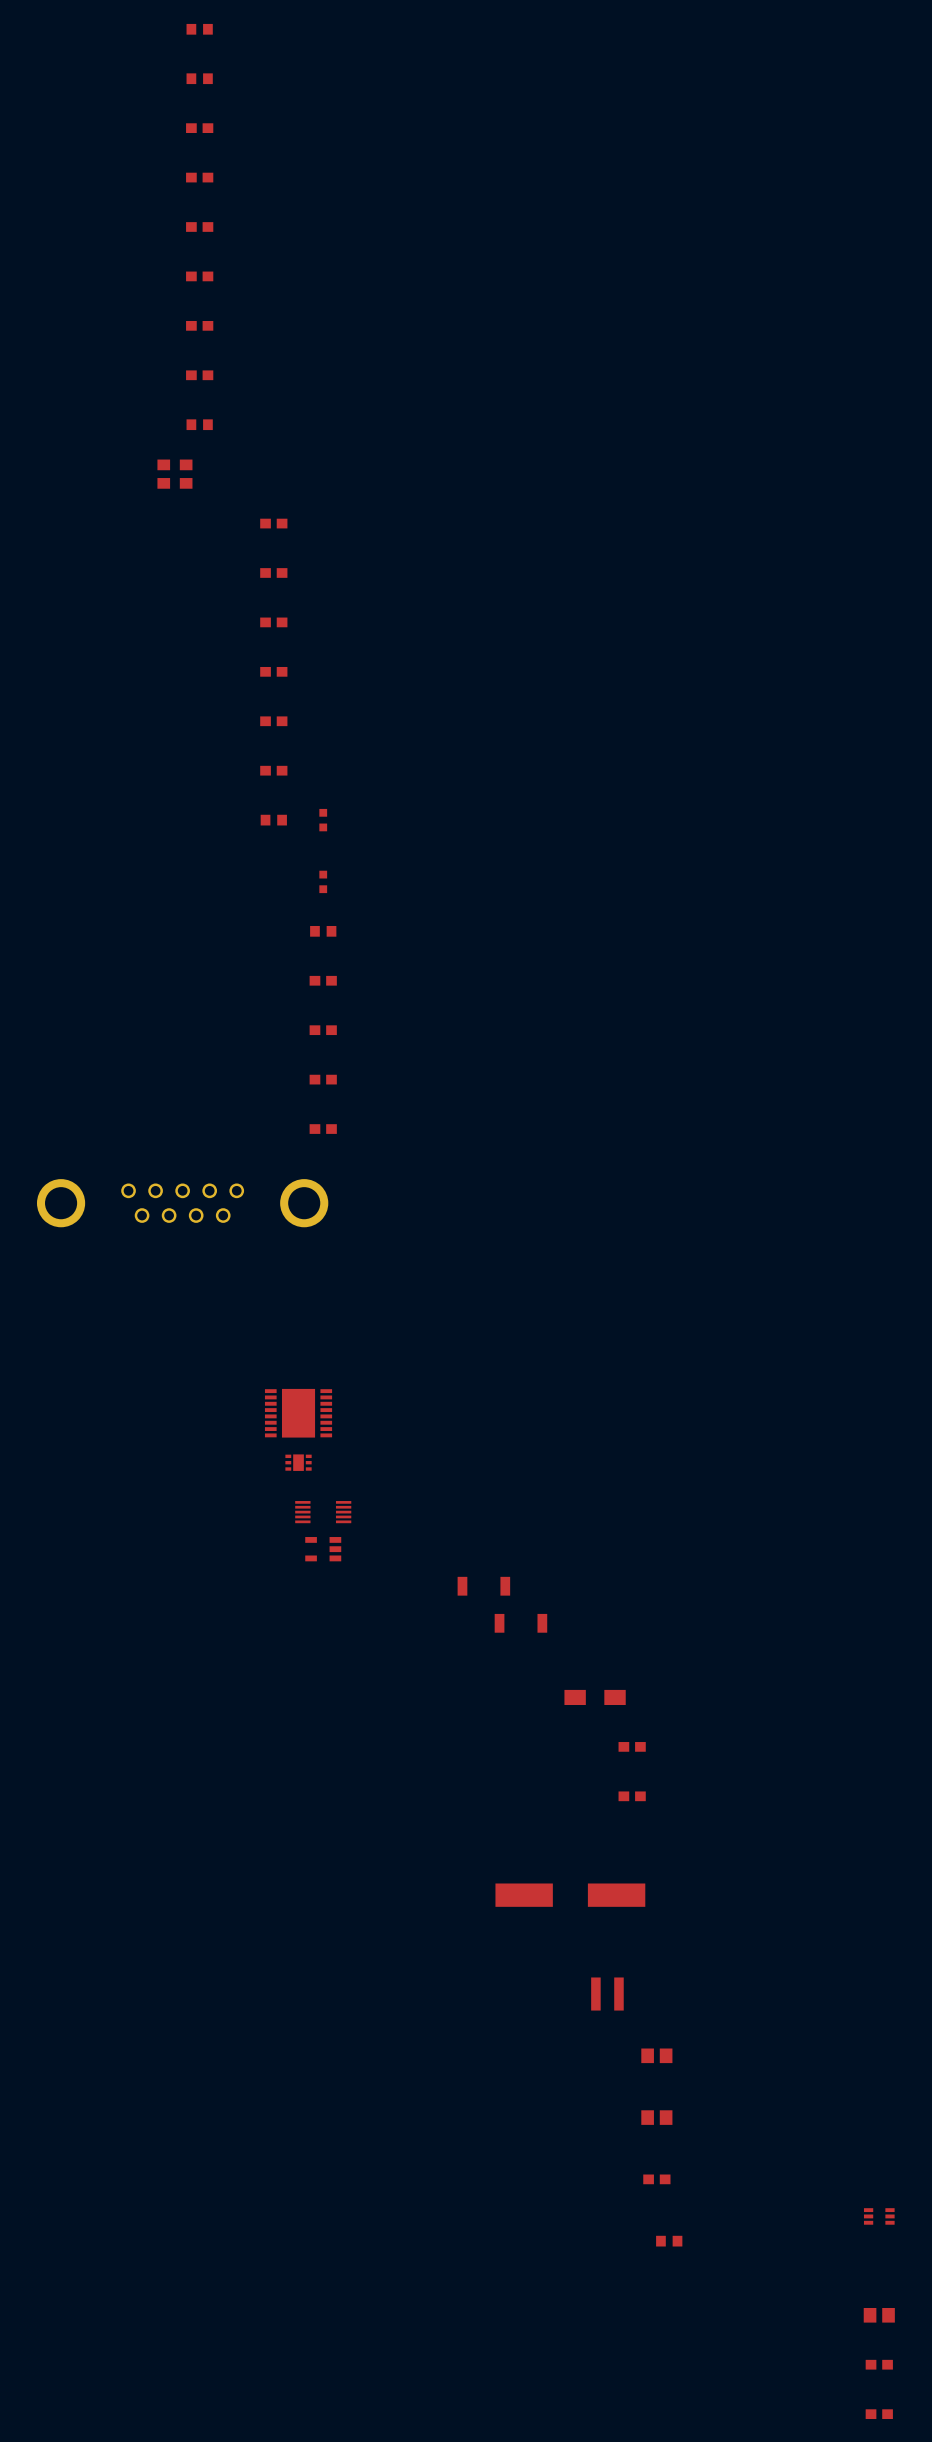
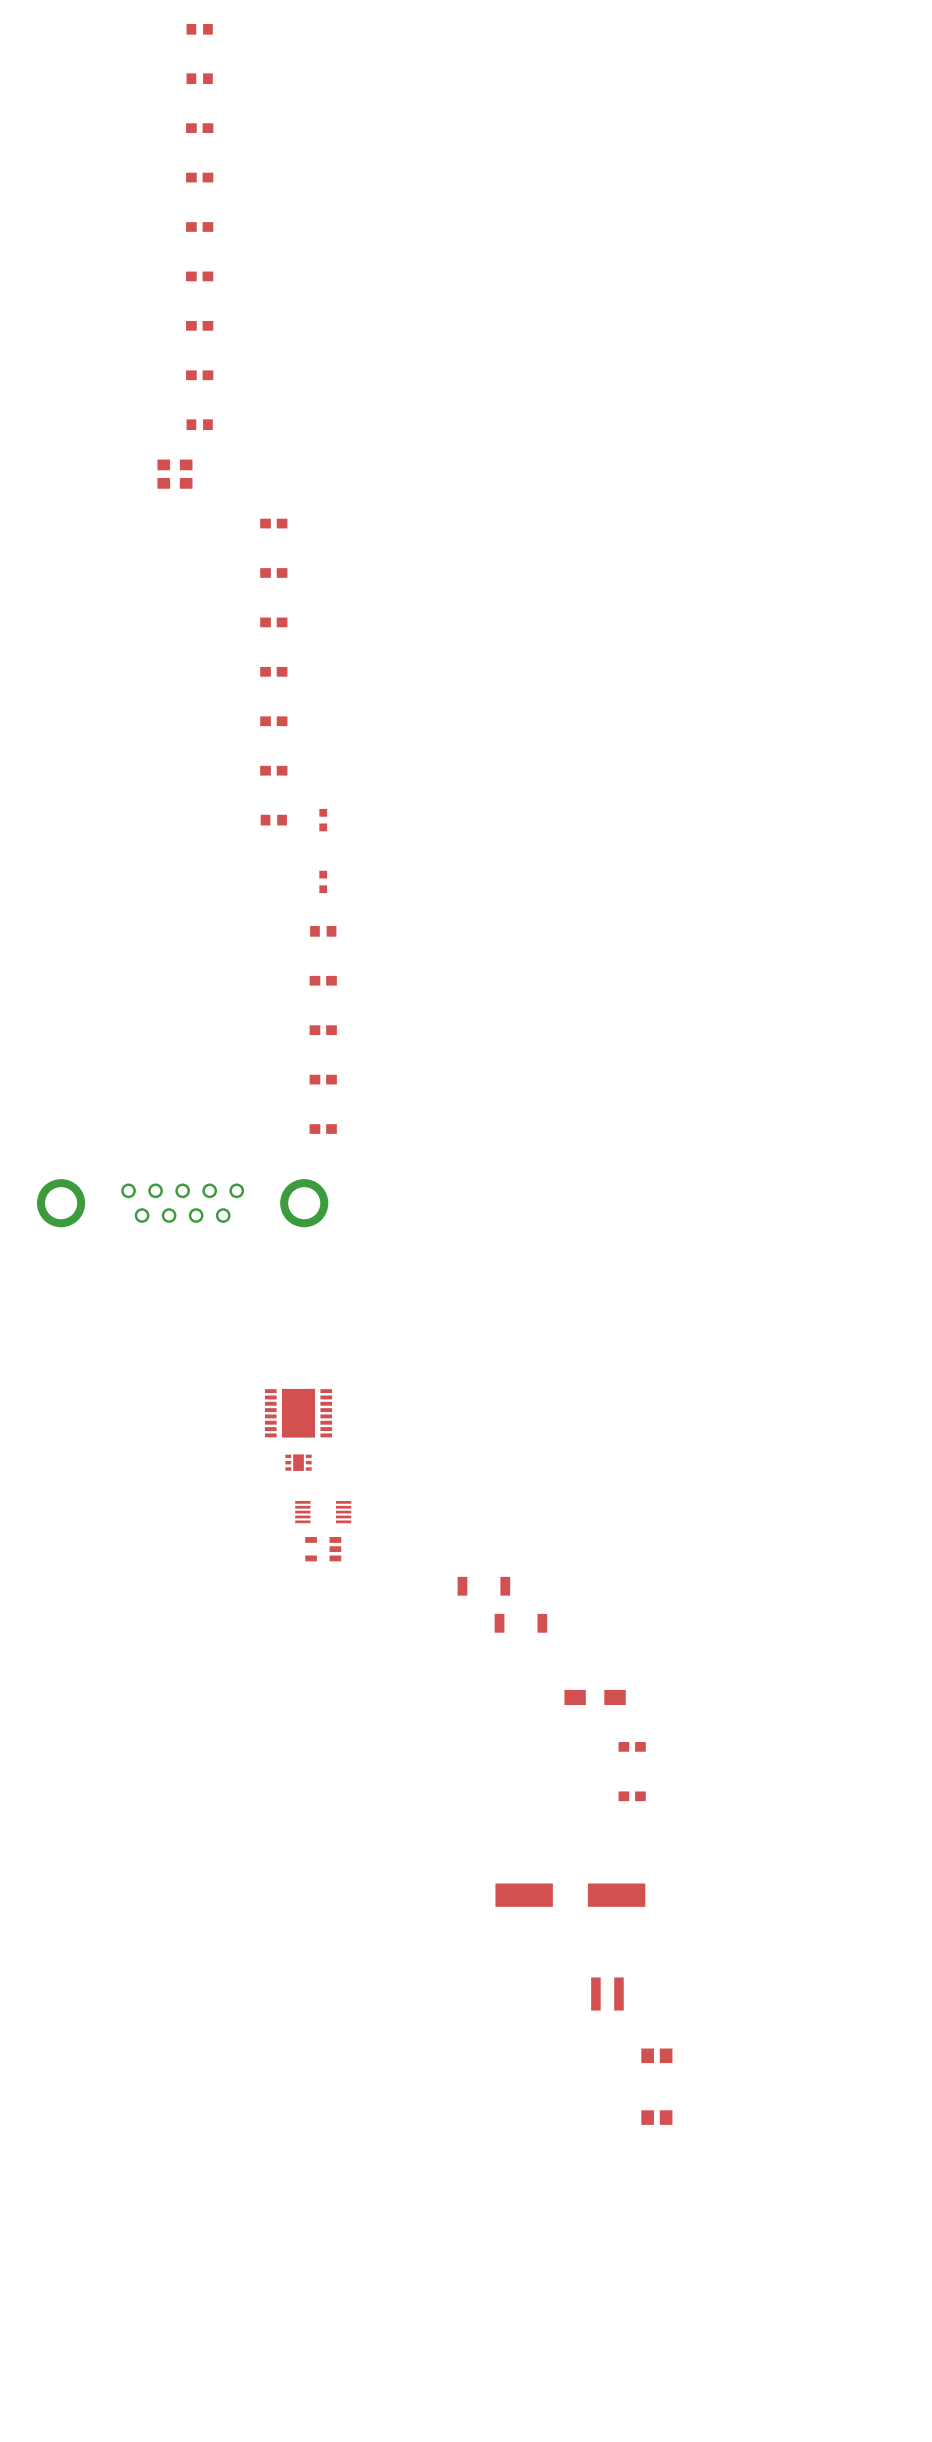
part: (656, 2179) -> none
part: (879, 2216) -> none
part: (669, 2241) -> none
part: (879, 2315) -> none
part: (879, 2364) -> none
part: (879, 2414) -> none

